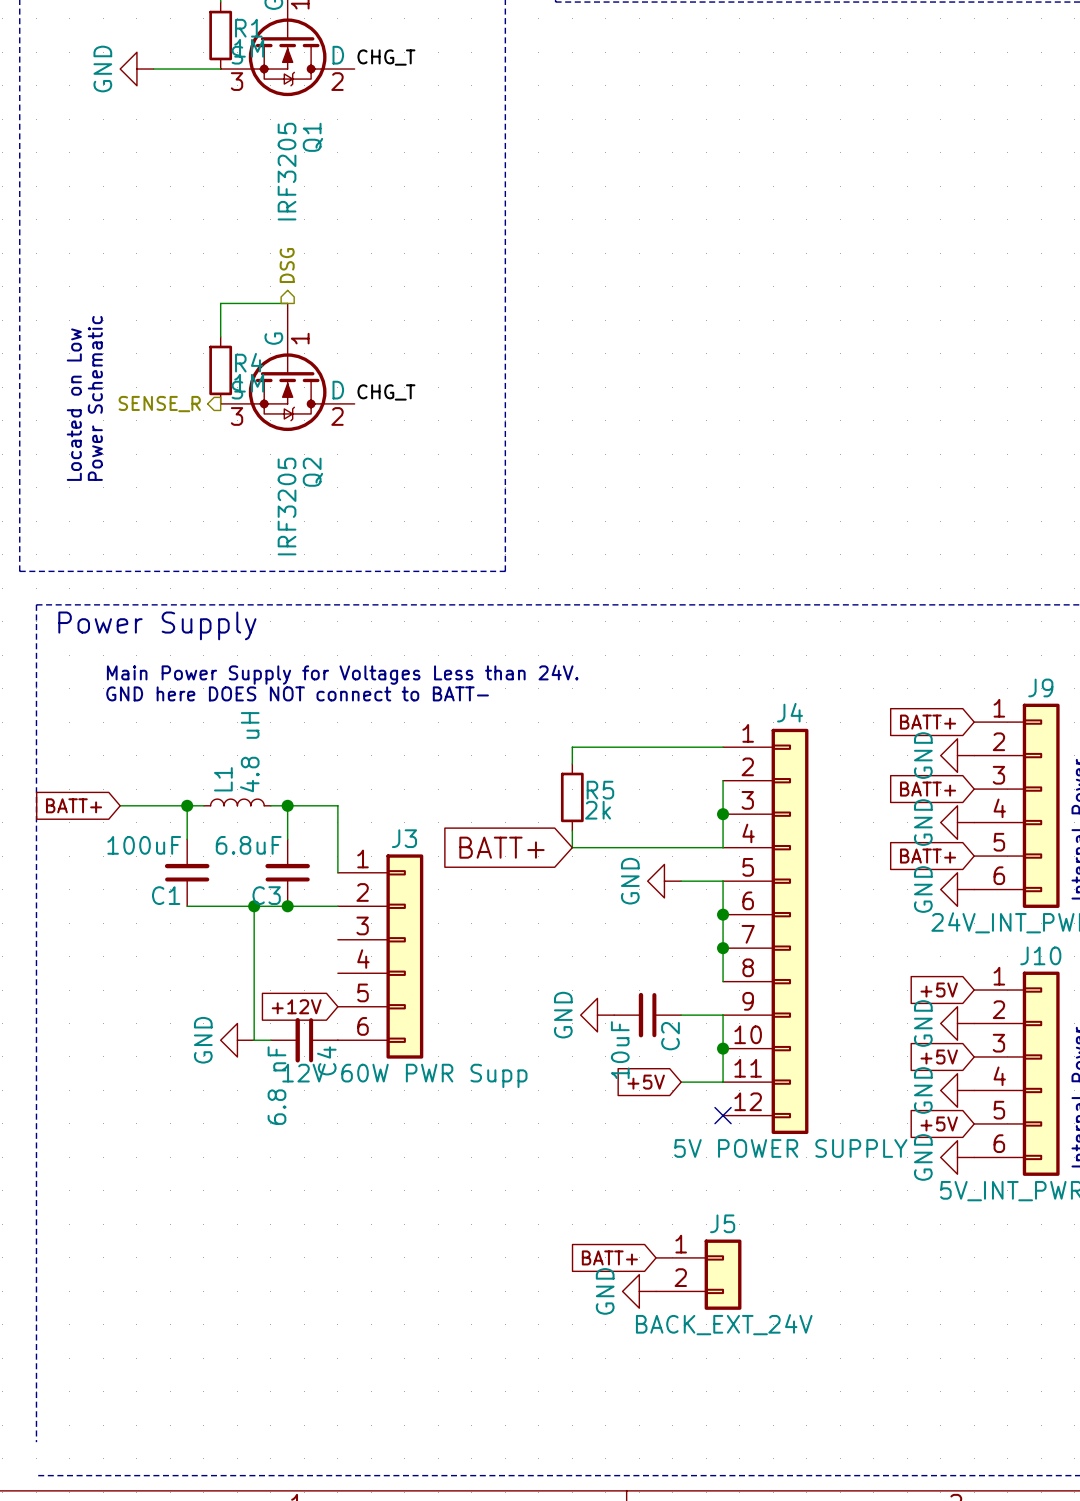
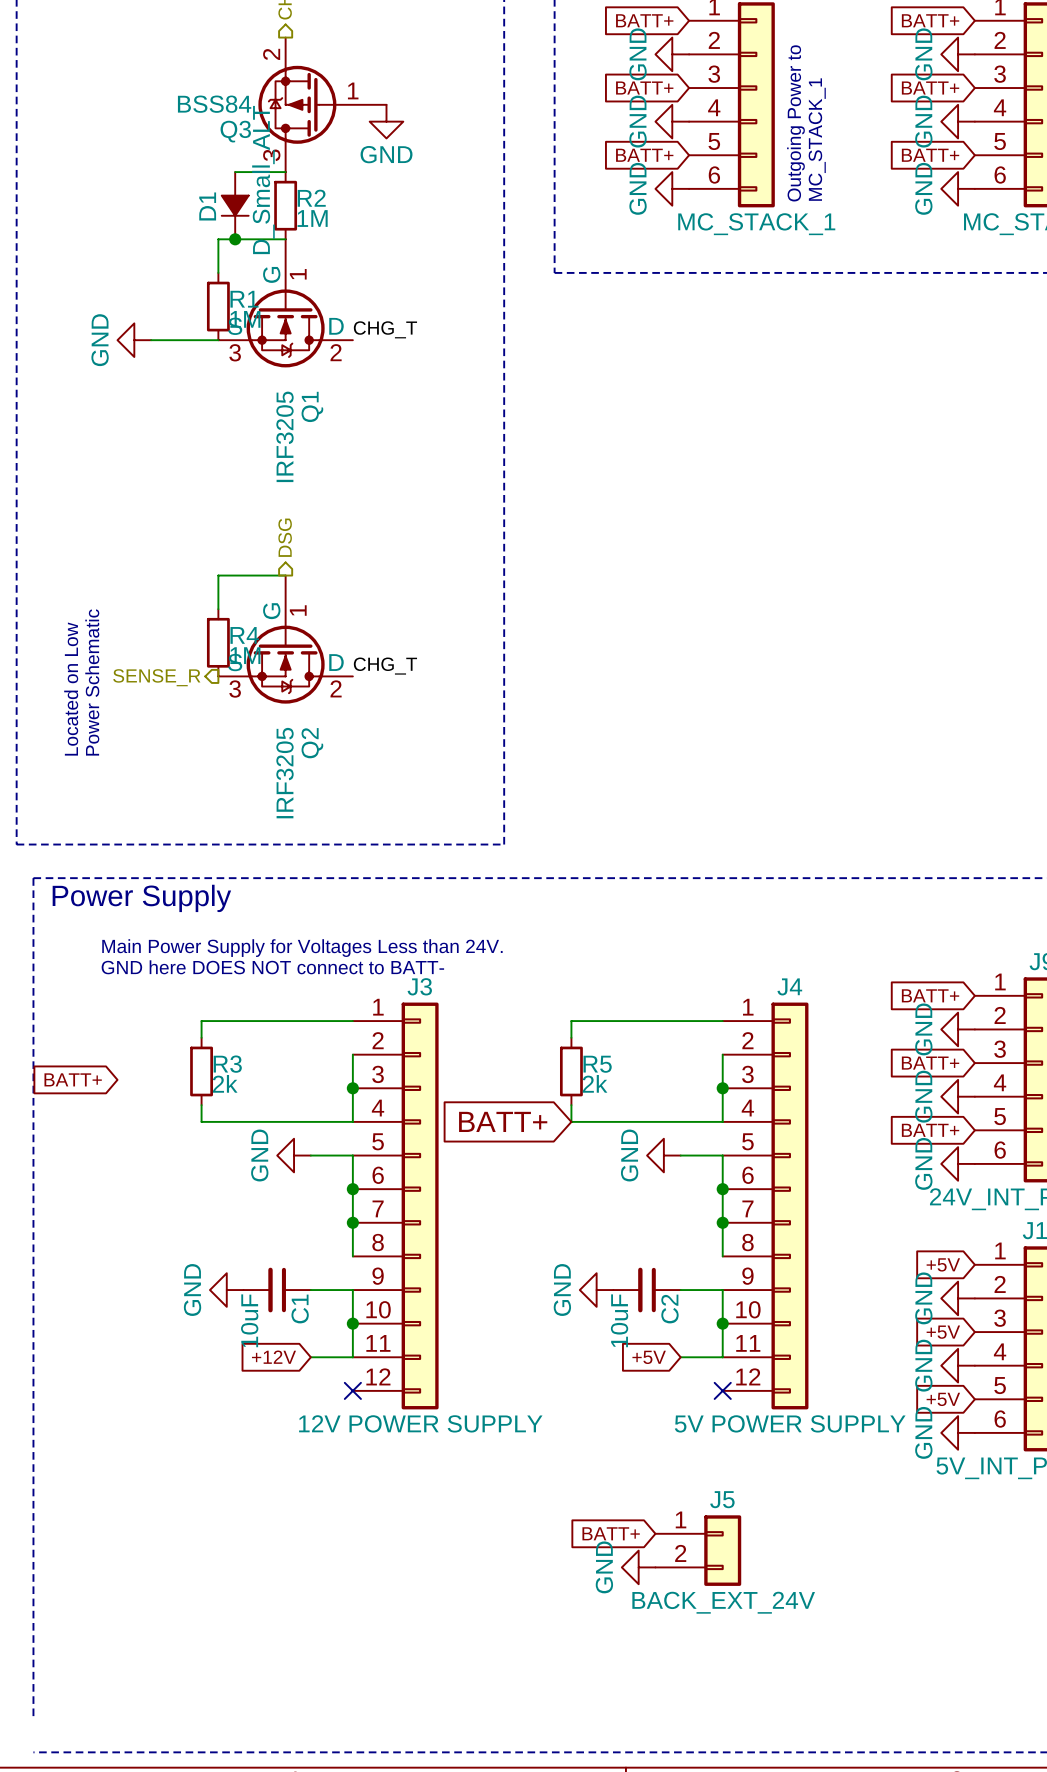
wire: none -> (352, 1021) (201, 1021) (201, 1037)
wire: none -> (352, 1054) (352, 1121) (201, 1121) (201, 1105)
R3: none -> 2k (201, 1071)
L1: 4.8 uH (237, 802) -> none
wire: (120, 805) (203, 805) -> none
wire: (187, 805) (187, 839) -> none
junction: (187, 805) -> none
wire: (270, 805) (337, 805) (337, 872) -> none
wire: (287, 805) (287, 839) -> none
junction: (287, 805) -> none
junction: none -> (352, 1088)
J3 name position: J3 (404, 838) -> J3 (419, 986)
C1 value: 100uF (144, 845) -> 10uF (249, 1320)
J3 symbol: [337, 854, 424, 1059] -> [352, 1002, 439, 1410]
C1 rotation: 0° (187, 872) -> 90° counterclockwise (277, 1290)
C1 position: (187, 872) -> (277, 1290)
C3: 6.8uF (287, 872) -> none
power symbol: none -> GND (294, 1155)
wire: none -> (310, 1155) (352, 1155) (352, 1256)
wire: (187, 906) (337, 906) -> none
wire: (254, 906) (254, 1040) (270, 1040) -> none
junction: (254, 906) -> none
junction: (287, 906) -> none
junction: none -> (352, 1189)
junction: none -> (352, 1222)
global label position: +12V (296, 1006) -> +12V (273, 1357)
wire: none -> (310, 1290) (352, 1290) (352, 1357) (310, 1357)
power symbol position: GND (237, 1040) -> GND (226, 1290)
C4: 6.8 nF (304, 1040) -> none
junction: none -> (352, 1323)
J3 value: 12V 60W PWR Supp (404, 1075) -> 12V POWER SUPPLY (420, 1423)
no-connect mark: none -> (352, 1390)

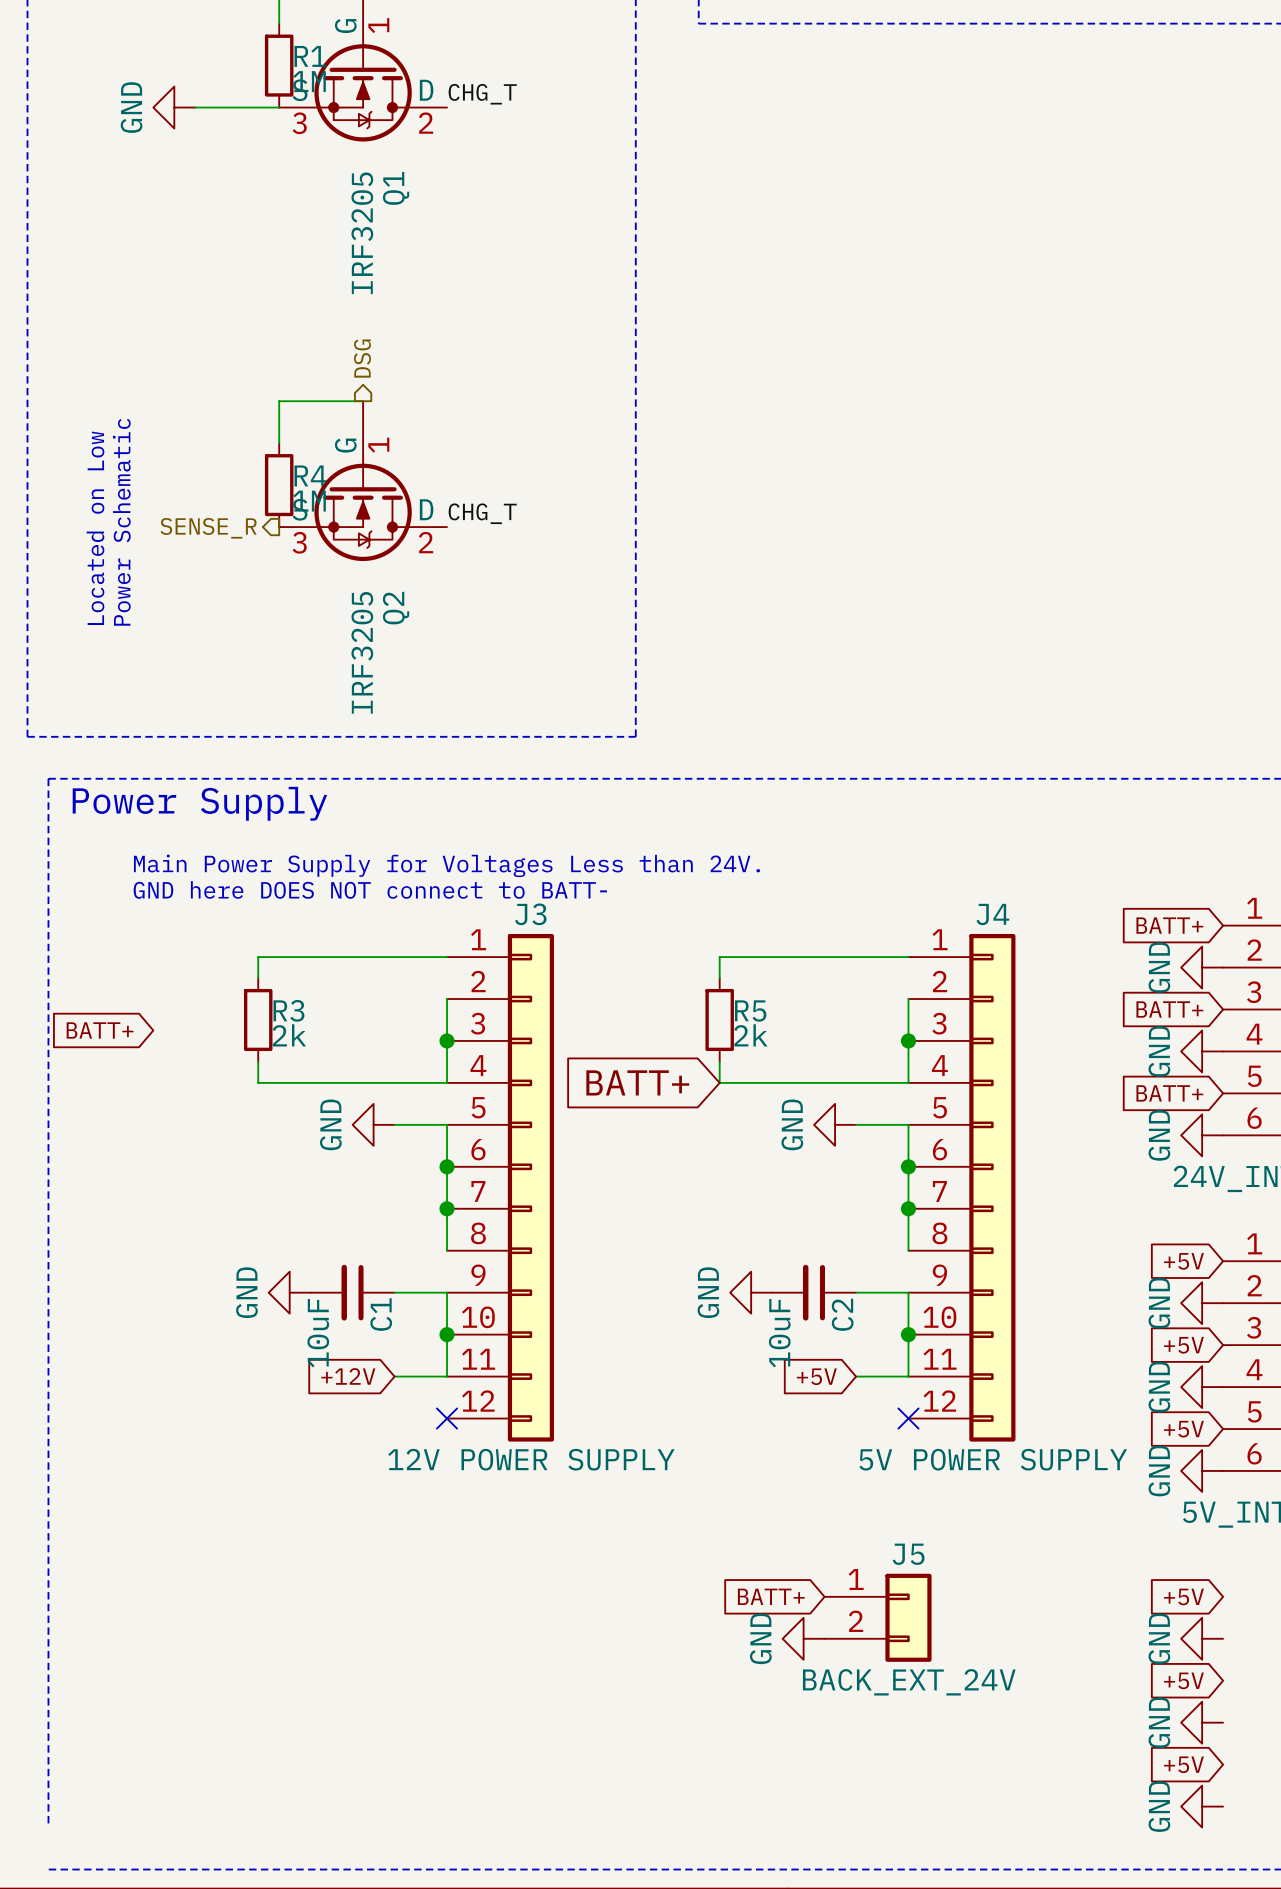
global label: none -> +5V (1183, 1596)
power symbol: none -> GND (1202, 1638)
global label: none -> +5V (1183, 1680)
power symbol: none -> GND (1202, 1722)
global label: none -> +5V (1183, 1764)
power symbol: none -> GND (1202, 1806)

